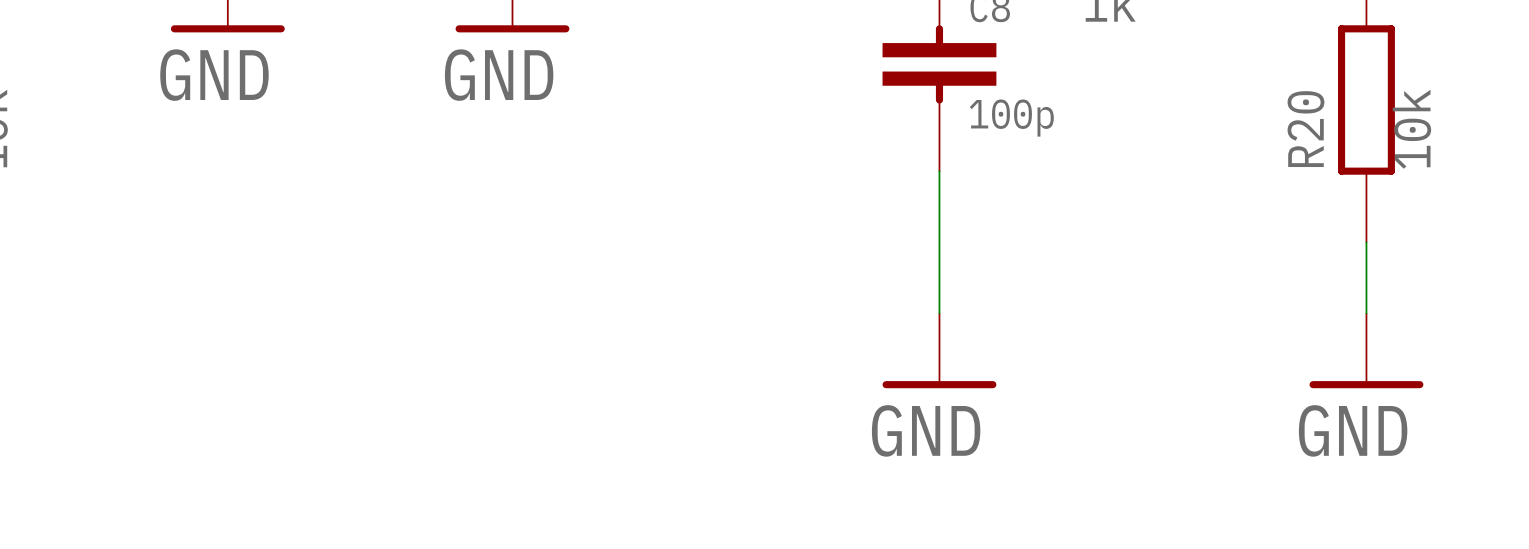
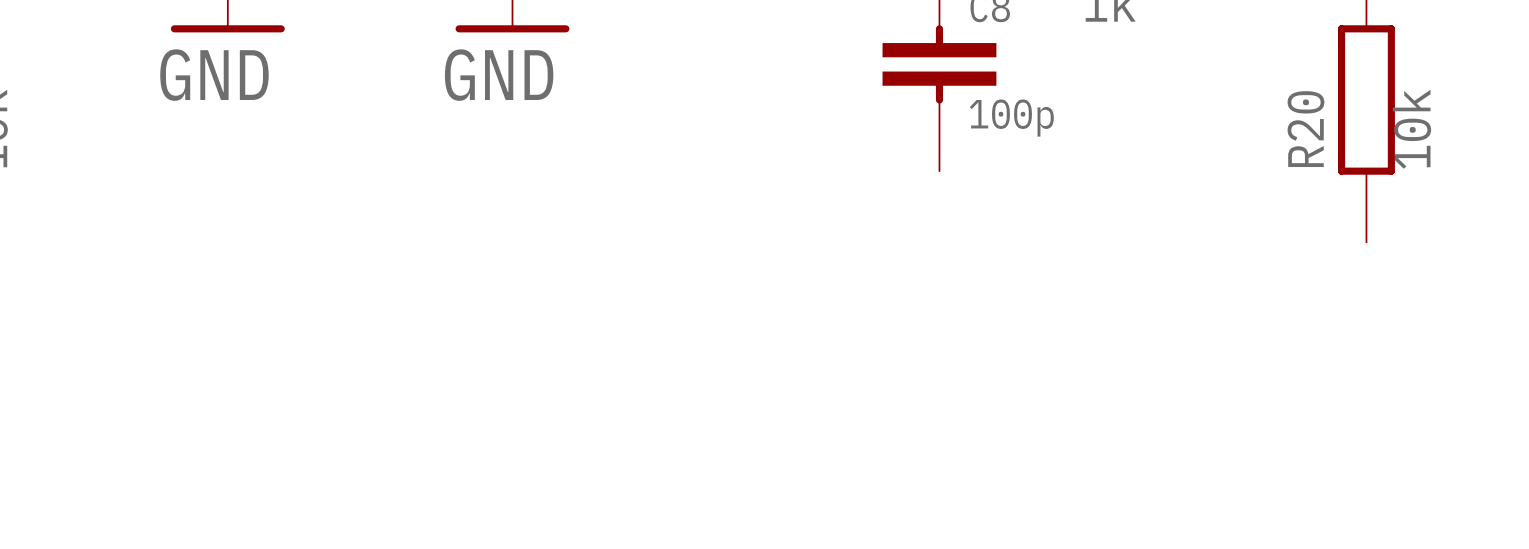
wire: (939, 171) (939, 313) -> none
wire: (1366, 242) (1366, 313) -> none
power symbol: GND (939, 350) -> none
power symbol: GND (1366, 350) -> none

